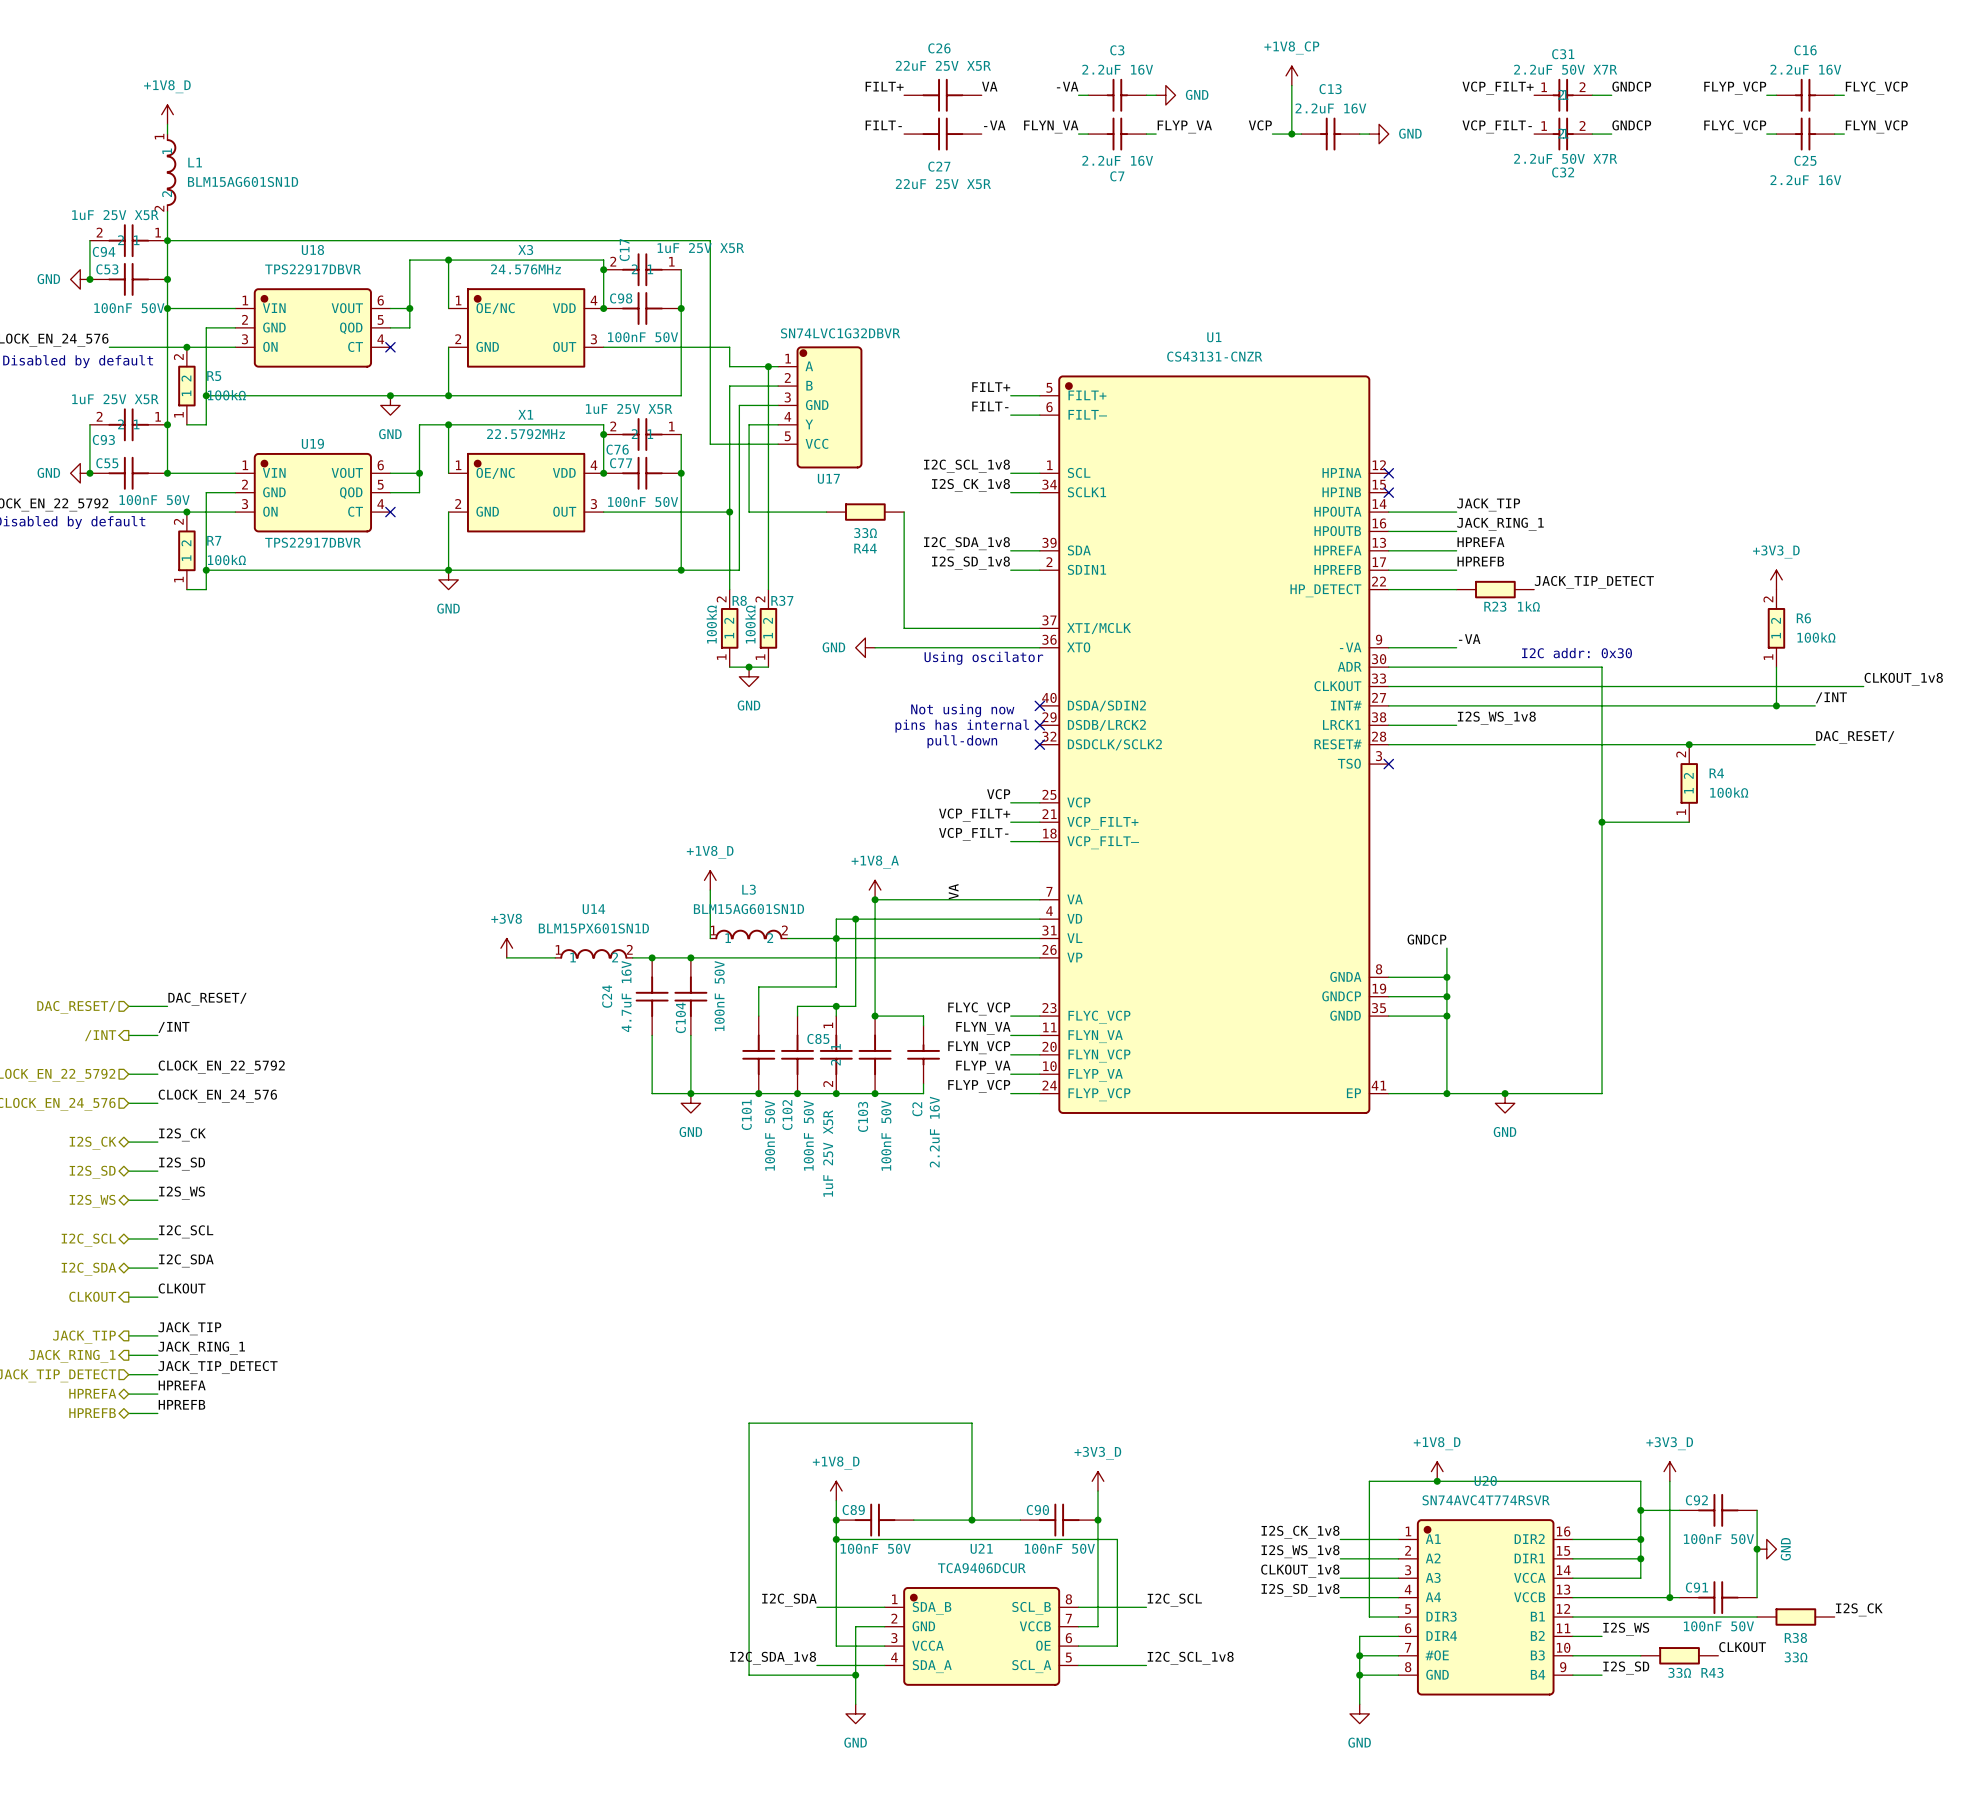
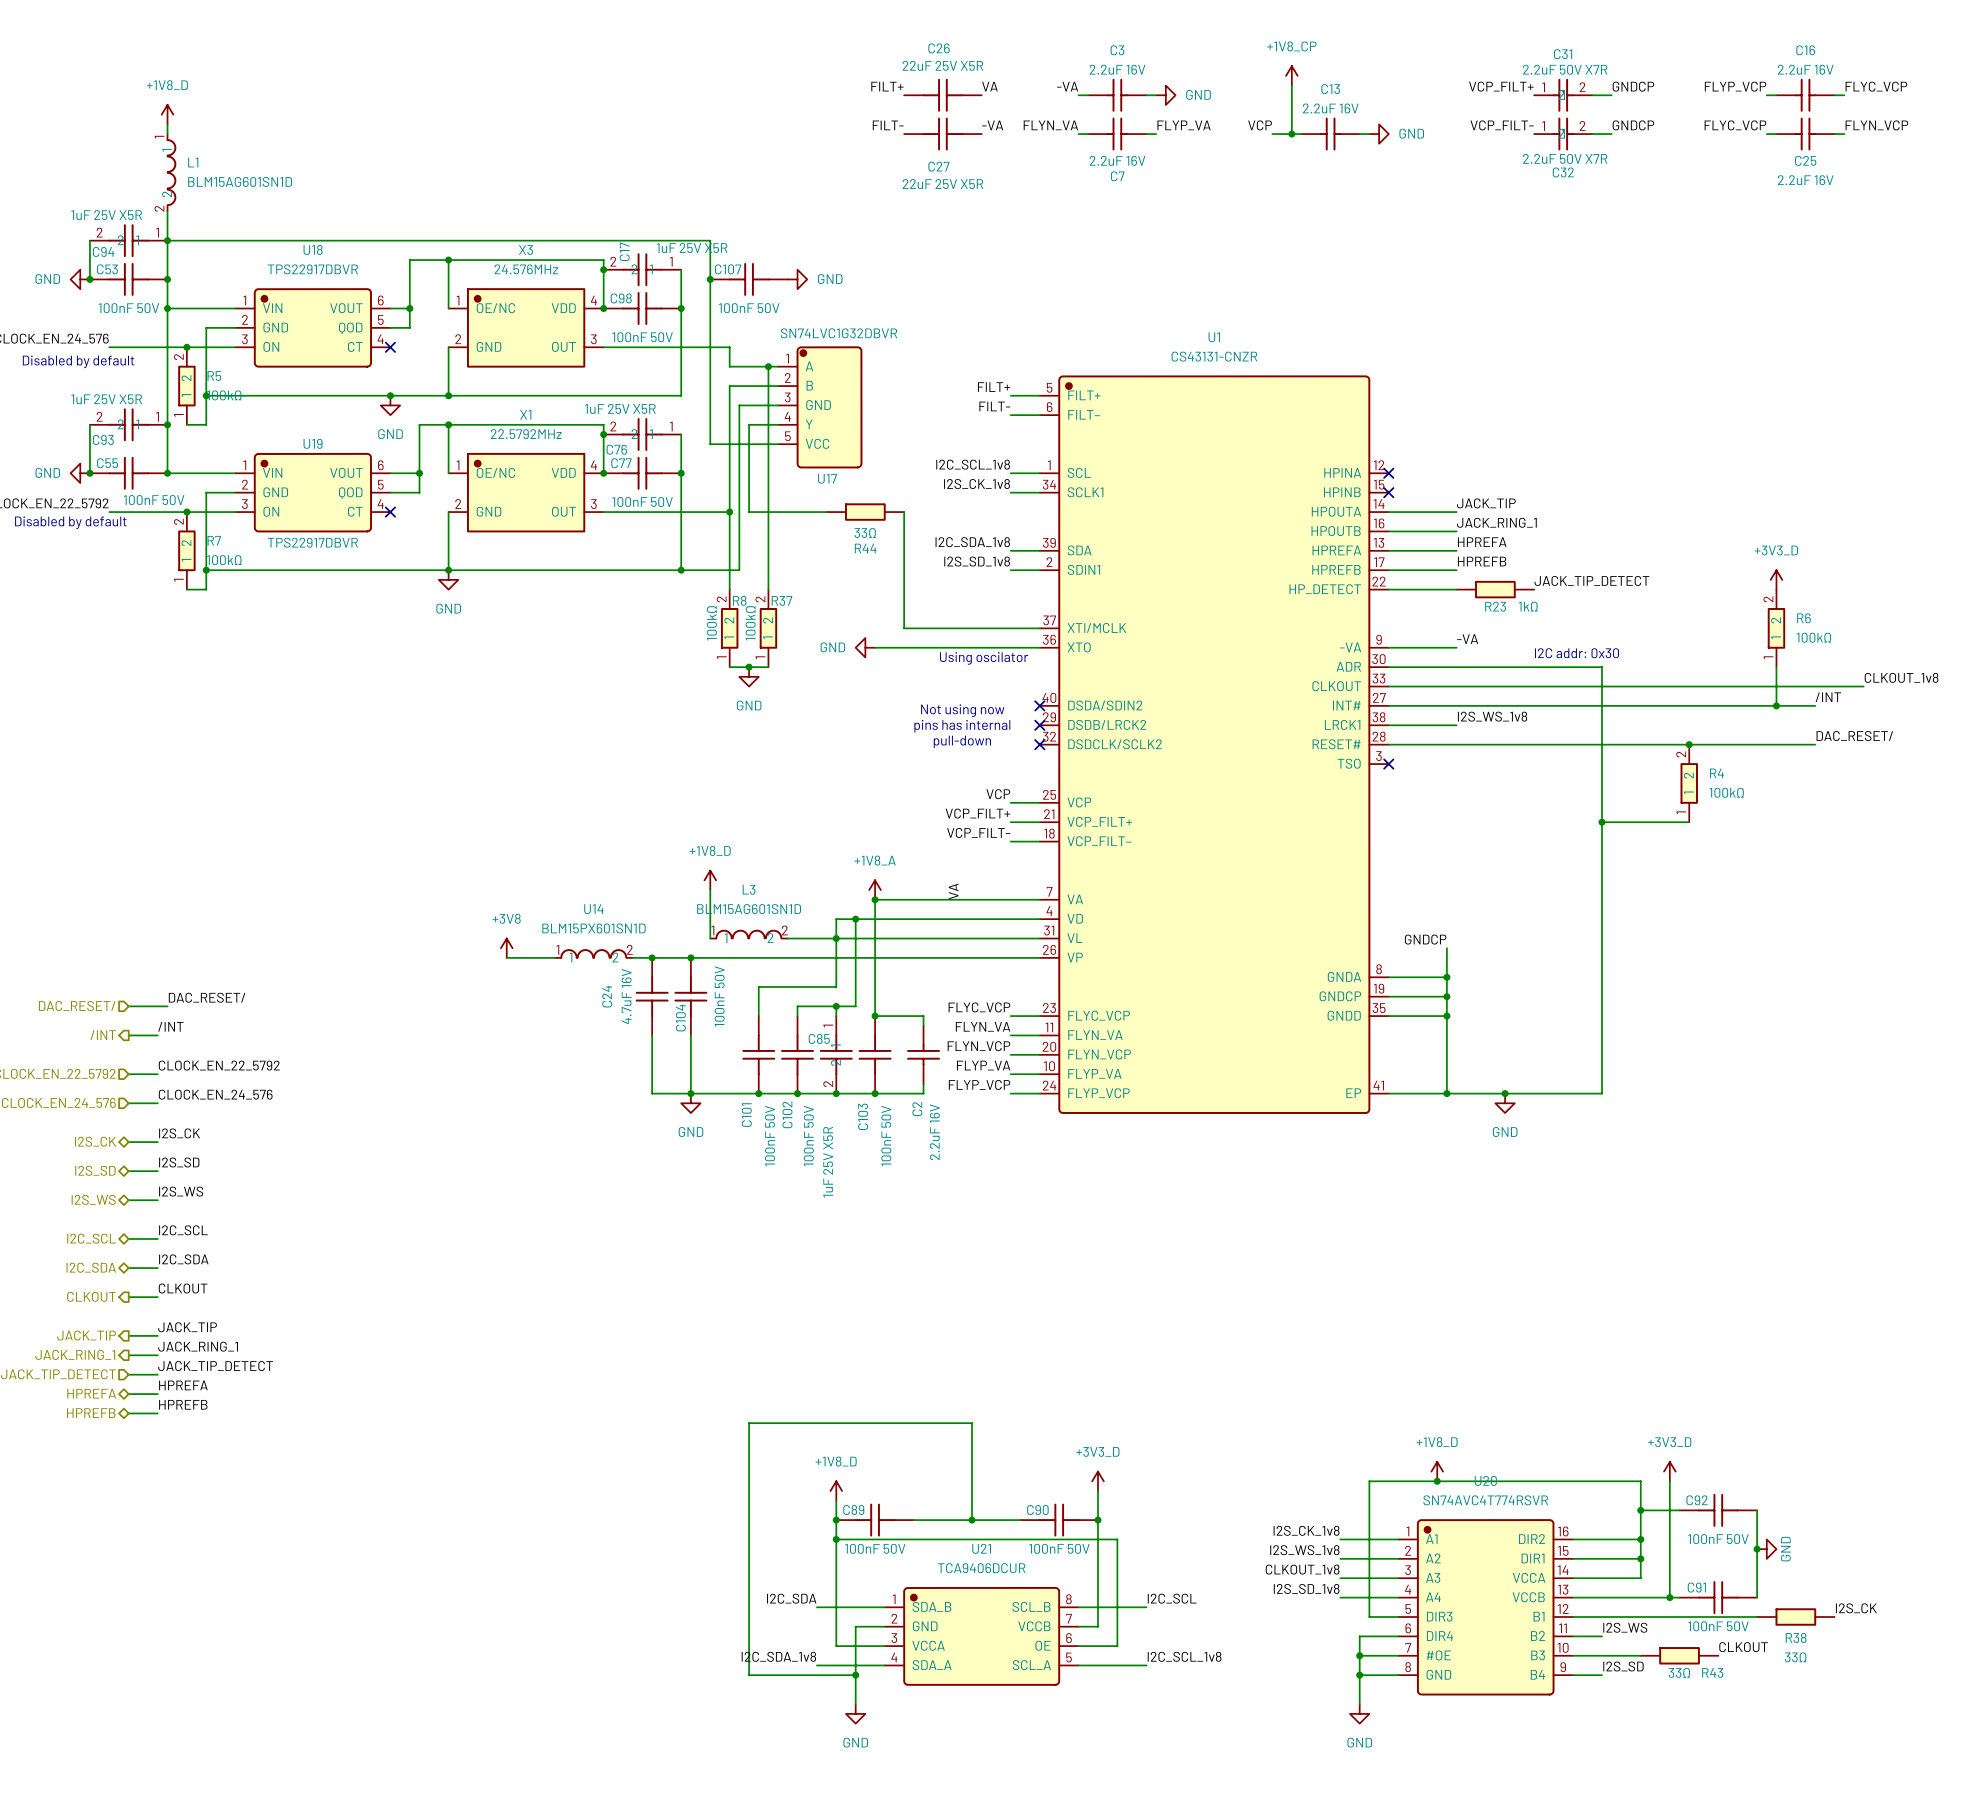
junction: none -> (710, 279)
C107: none -> 100nF 50V (749, 279)
power symbol: none -> GND (797, 279)

